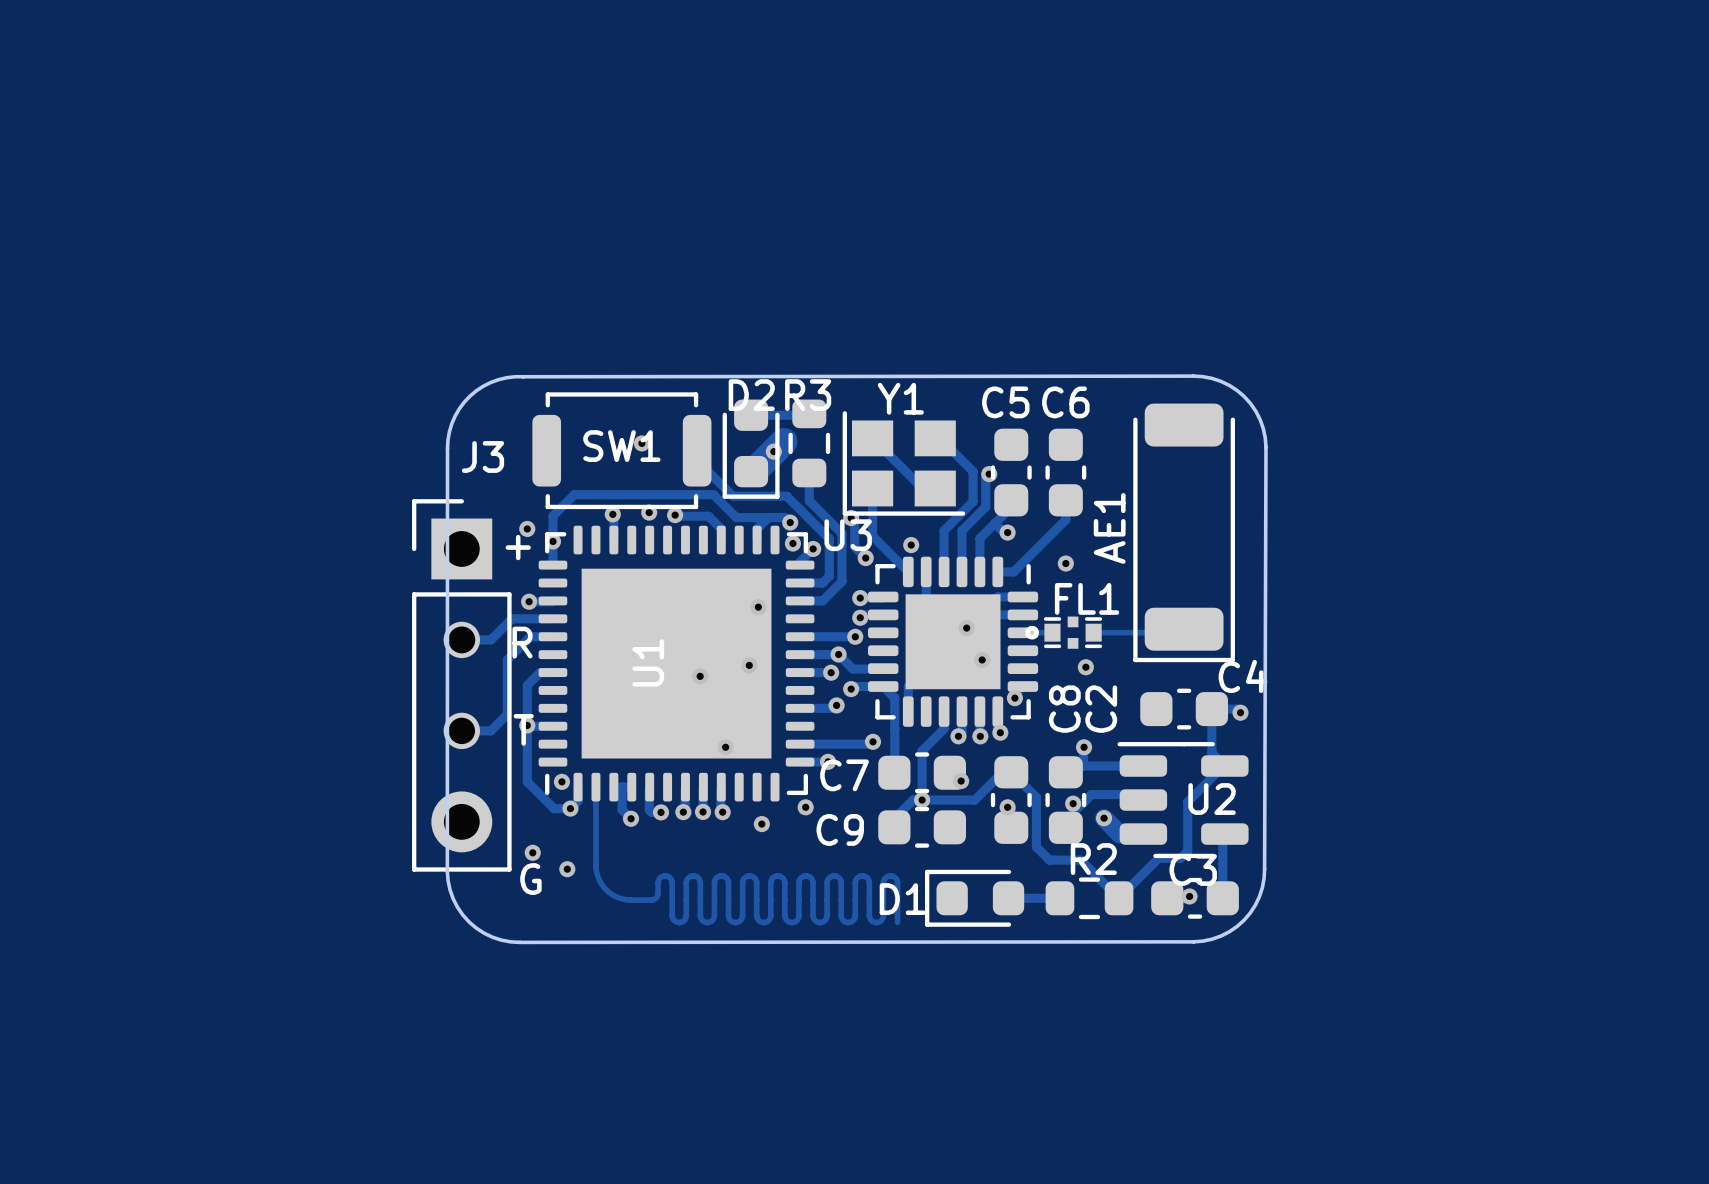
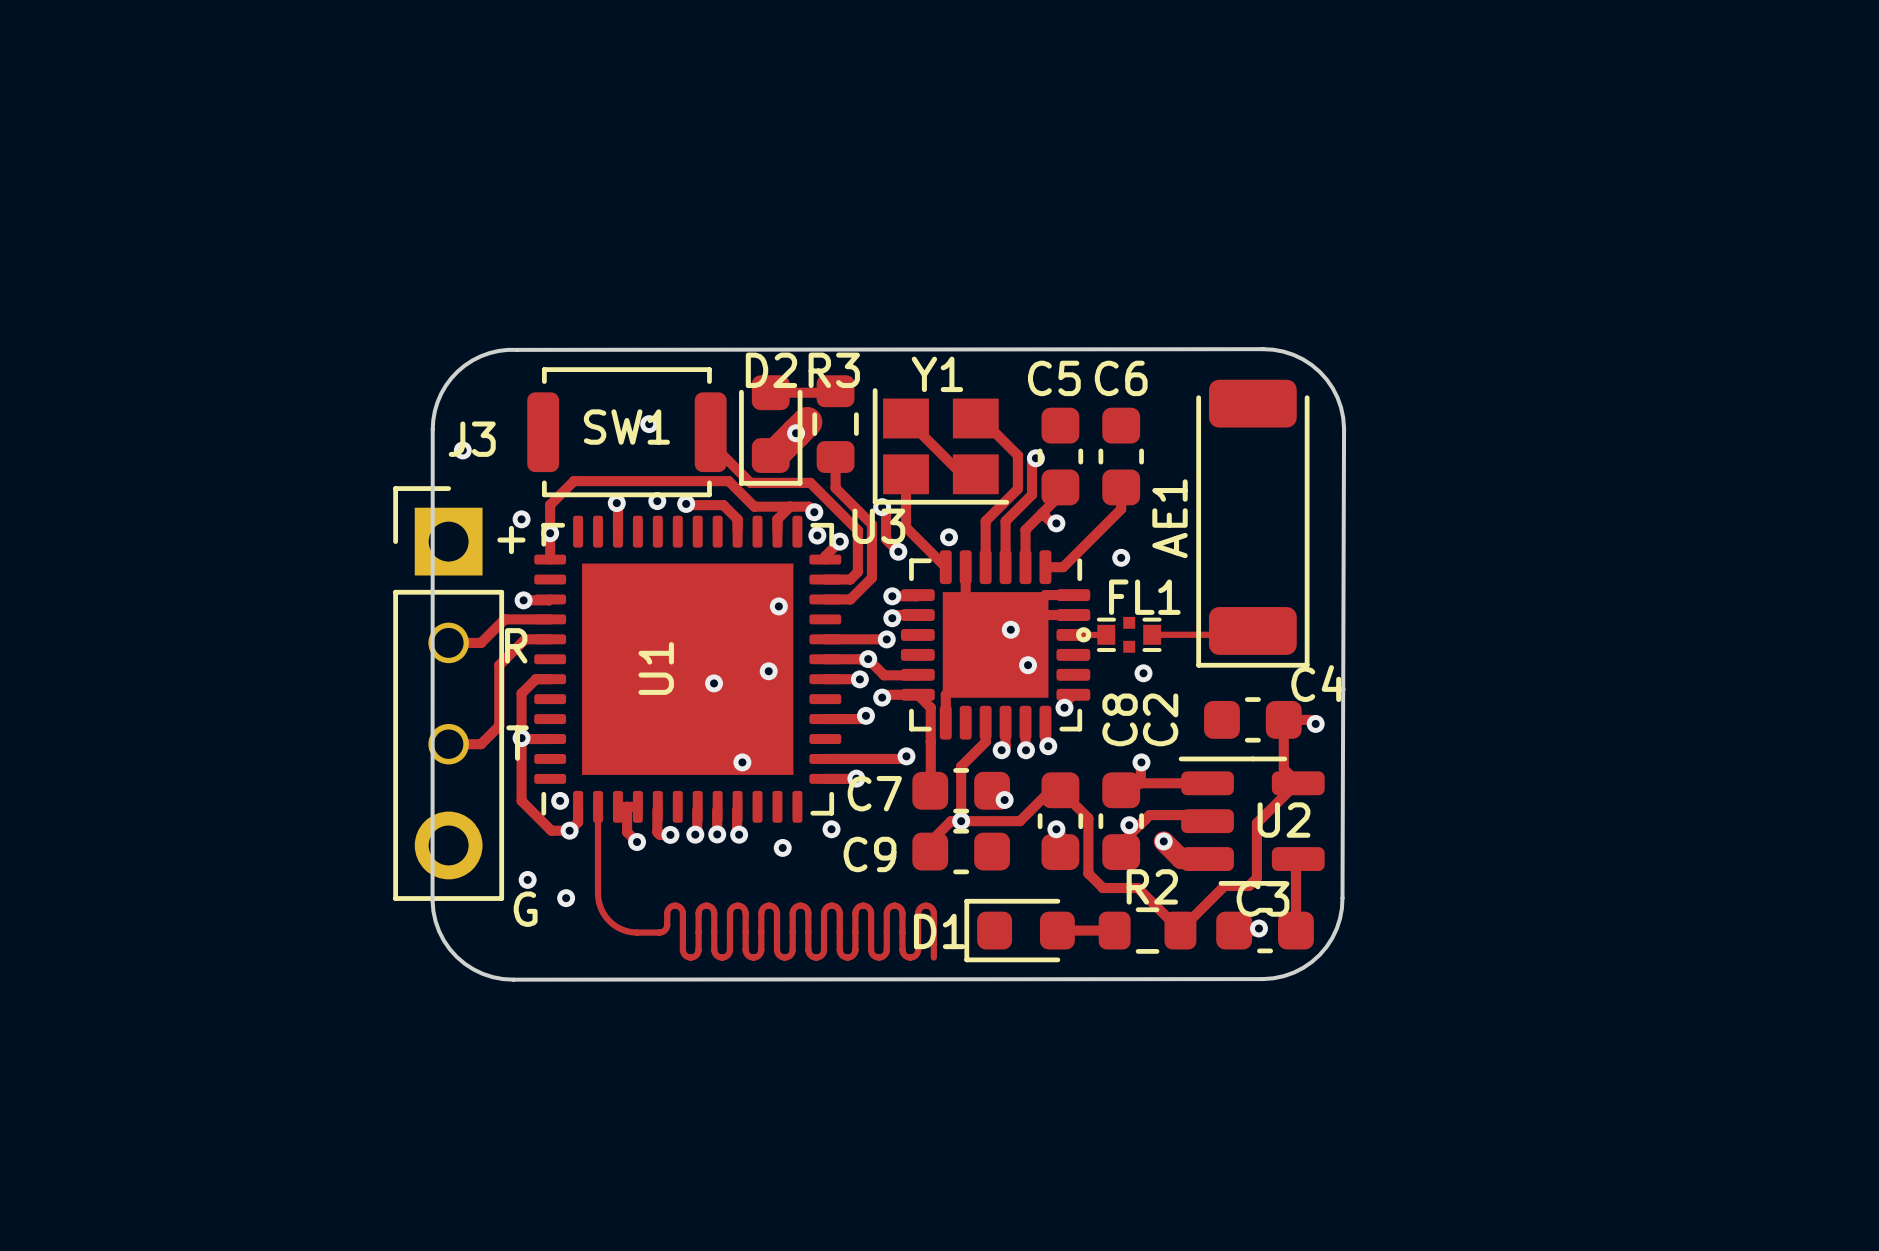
via: none -> (462, 450)

